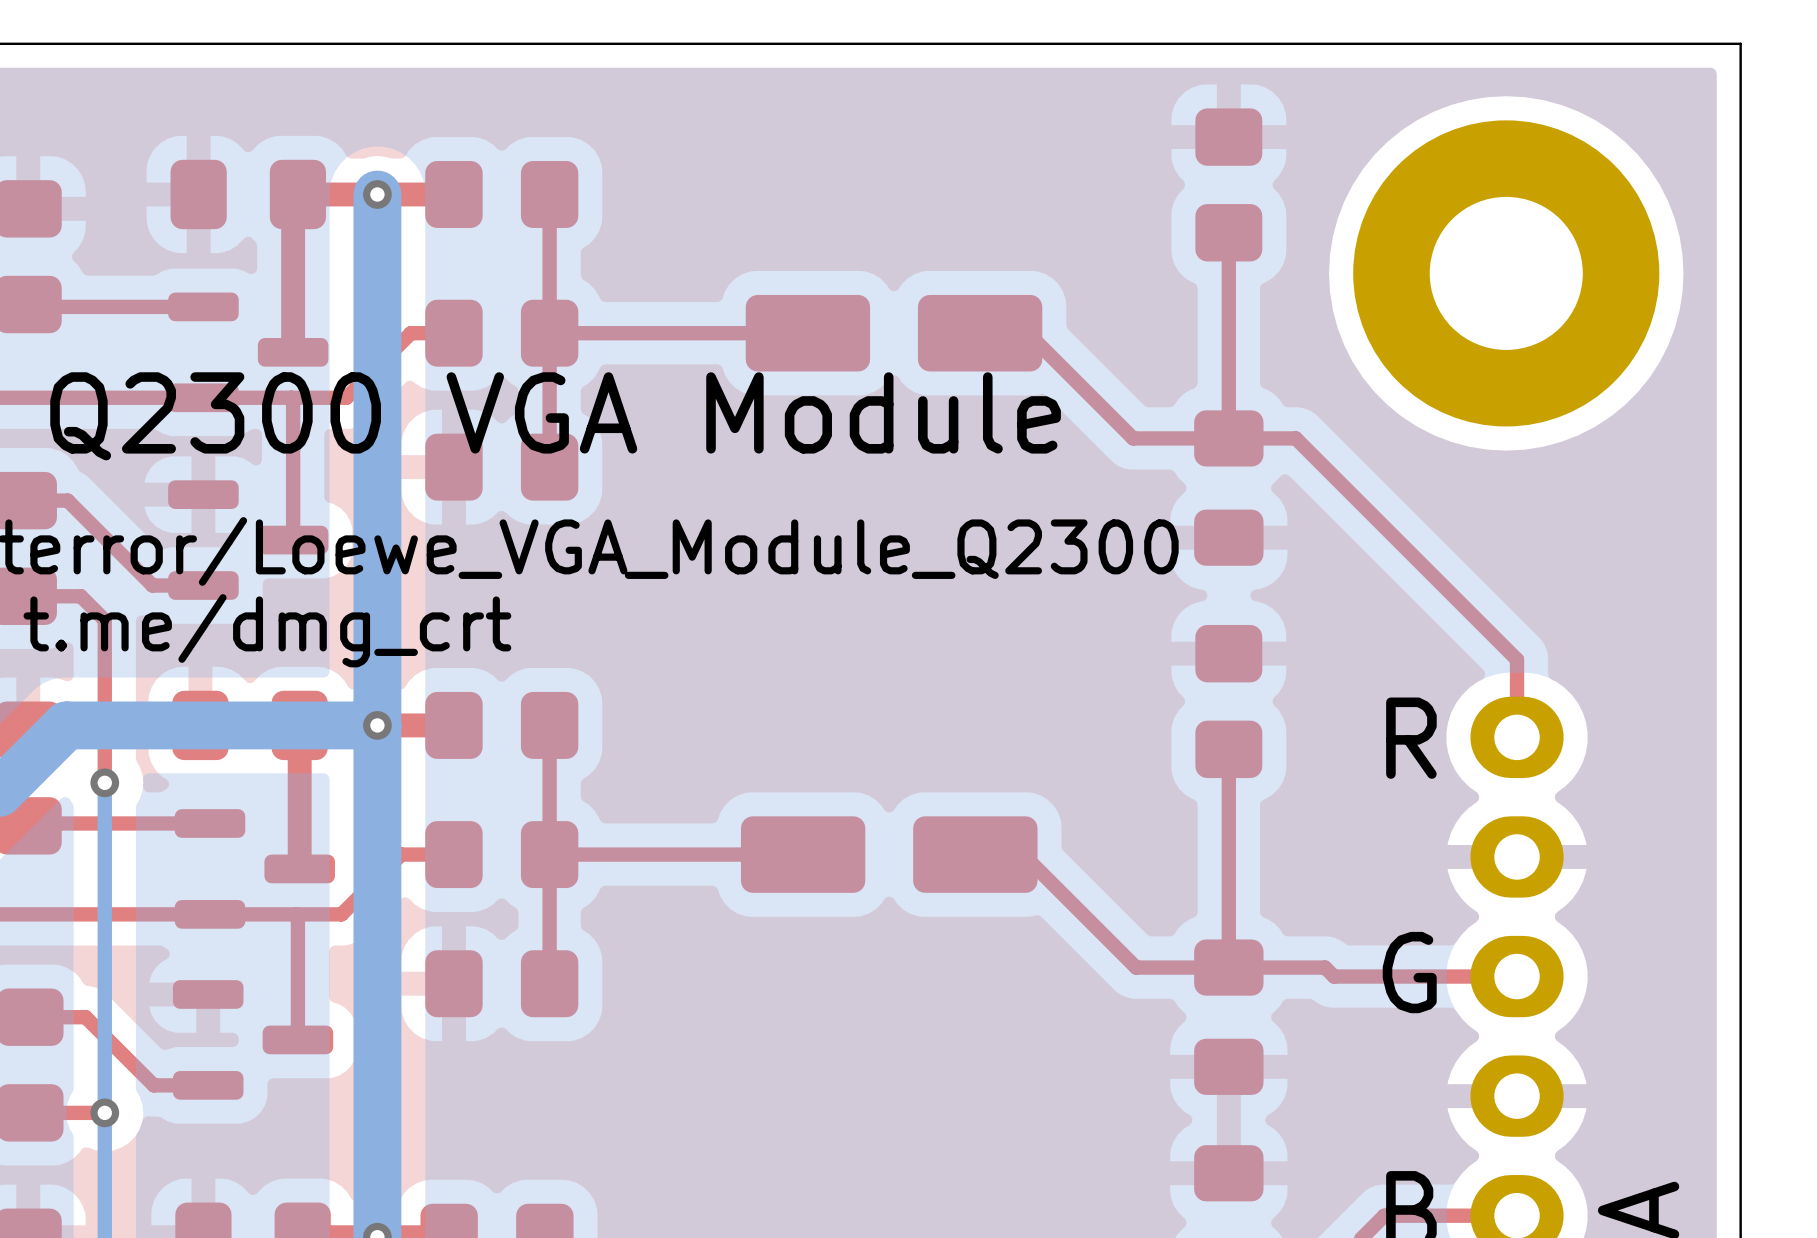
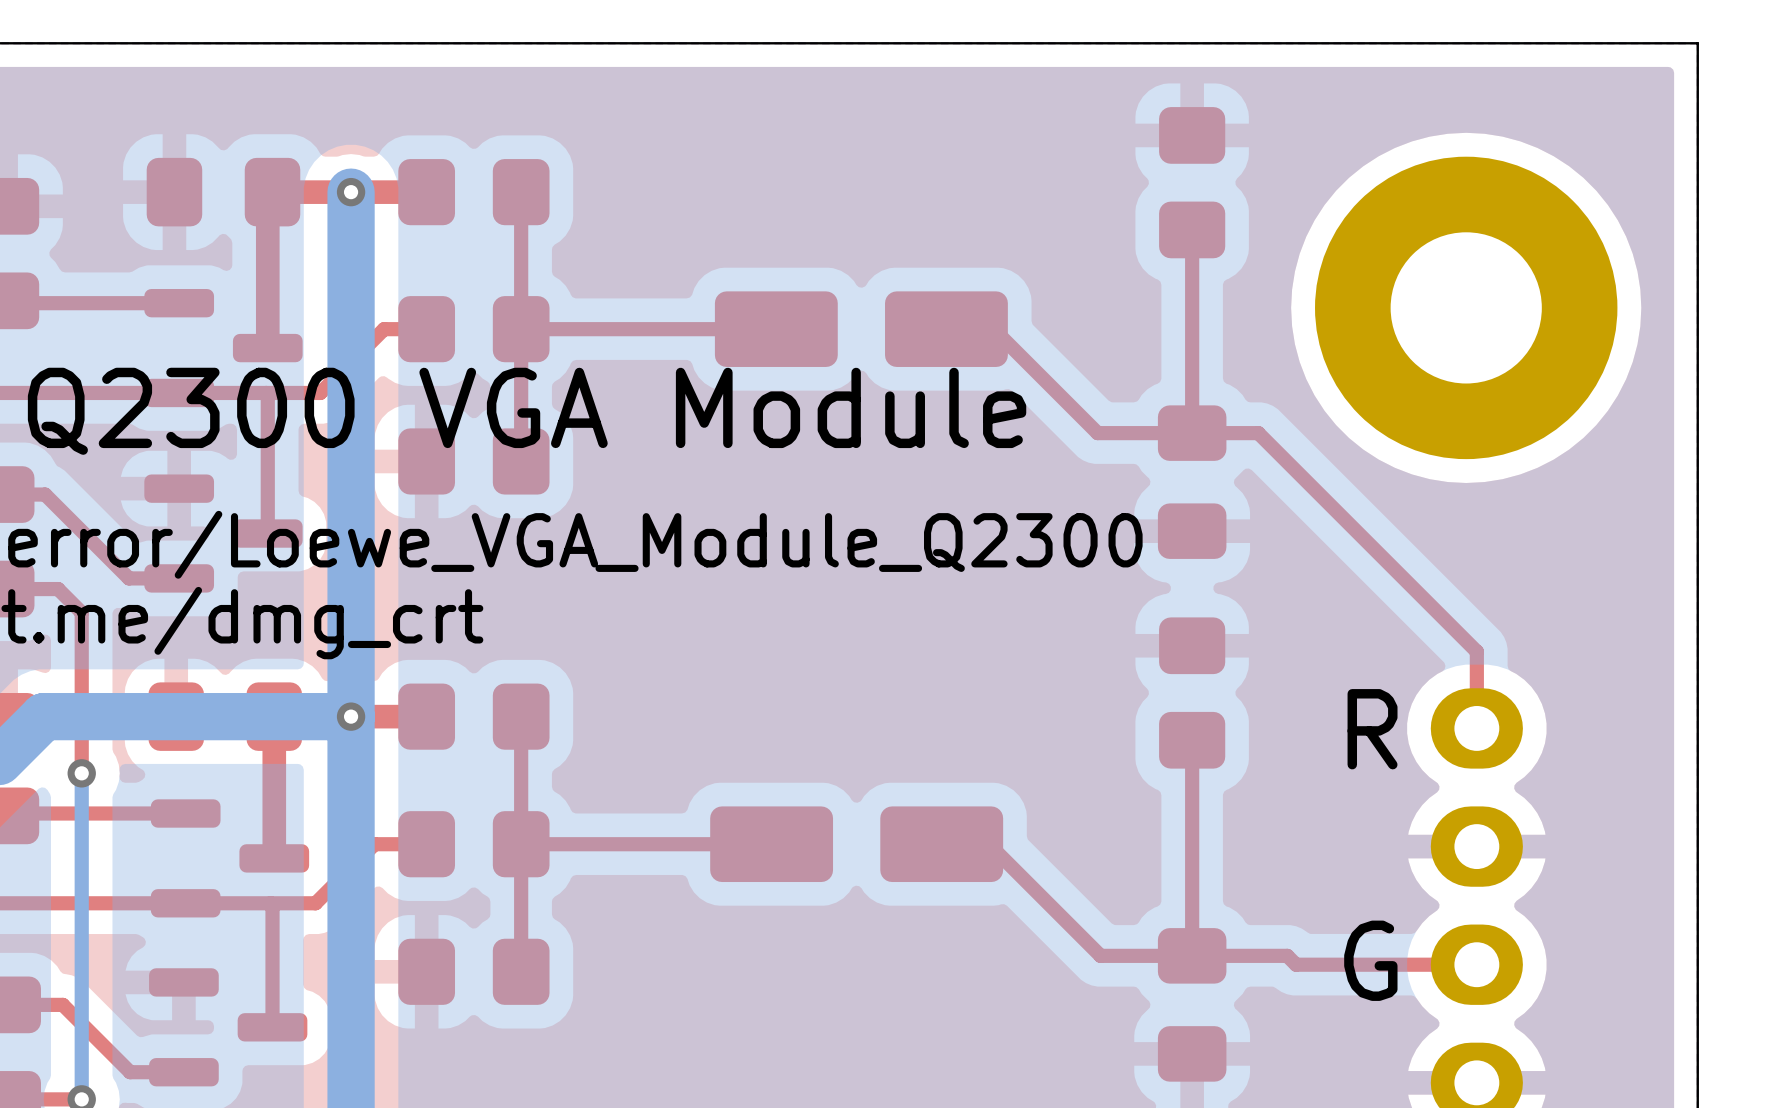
part position: (1506, 273) -> (1466, 307)

